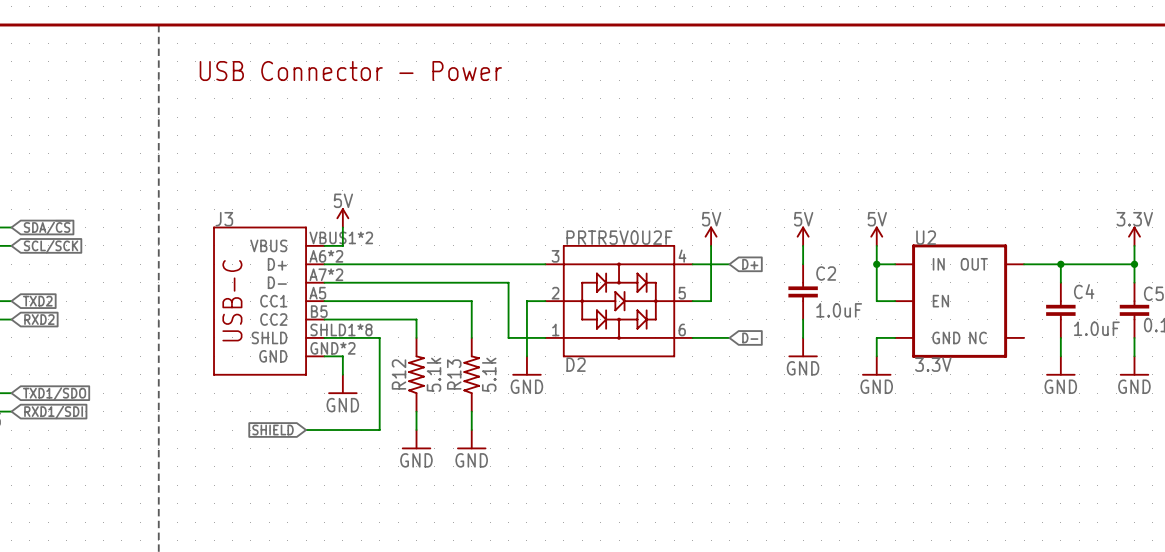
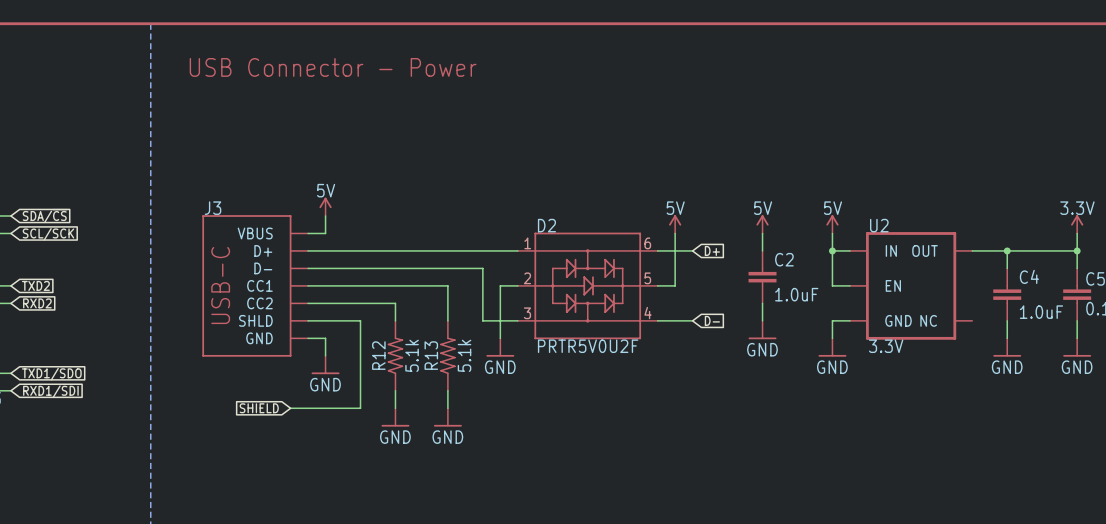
J3 pin number: VBUS1*2 (341, 237) -> none
J3 pin number: A6*2 (326, 256) -> none
J3 pin number: A7*2 (326, 274) -> none
J3 pin number: A5 (317, 293) -> none
D2 flip: as is (619, 301) -> up-down (587, 285)
J3 pin number: B5 (319, 311) -> none
J3 pin number: SHLD1*8 (341, 329) -> none
J3 pin number: GND*2 (332, 348) -> none

